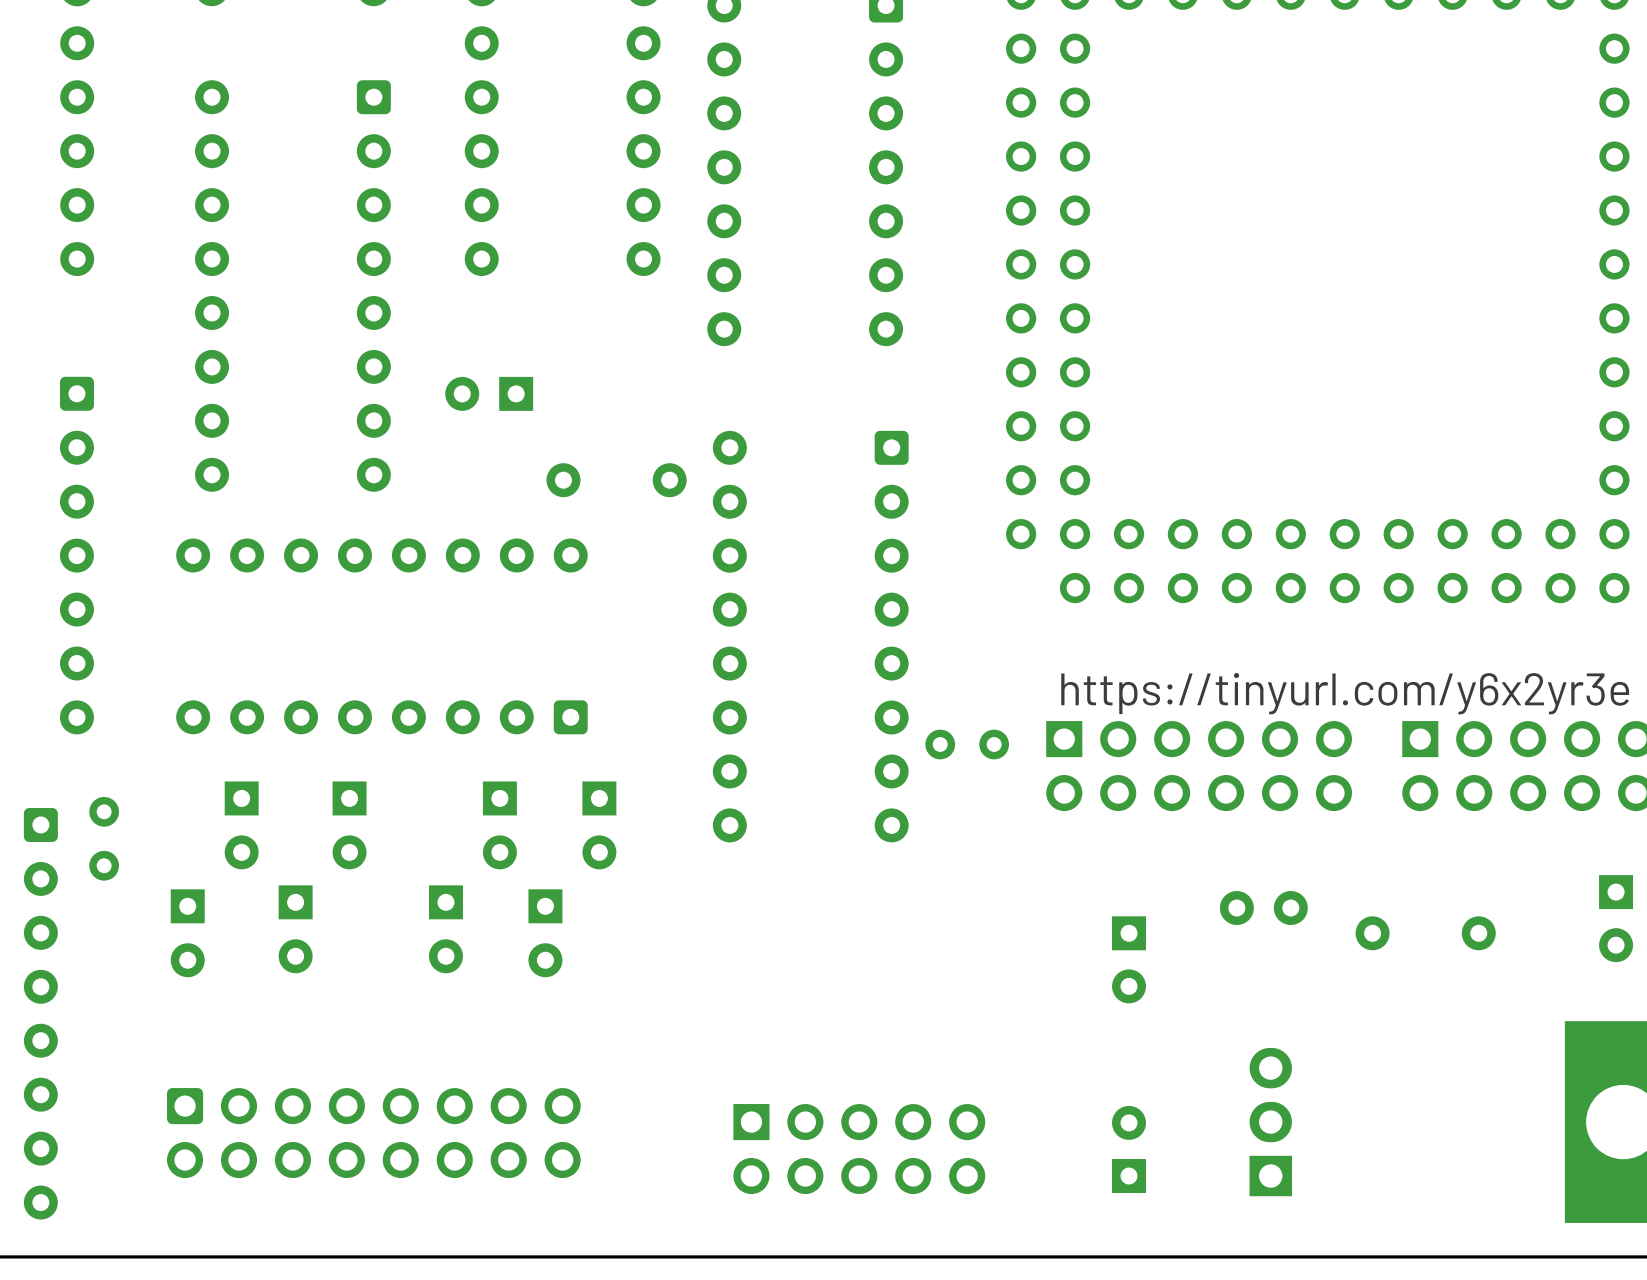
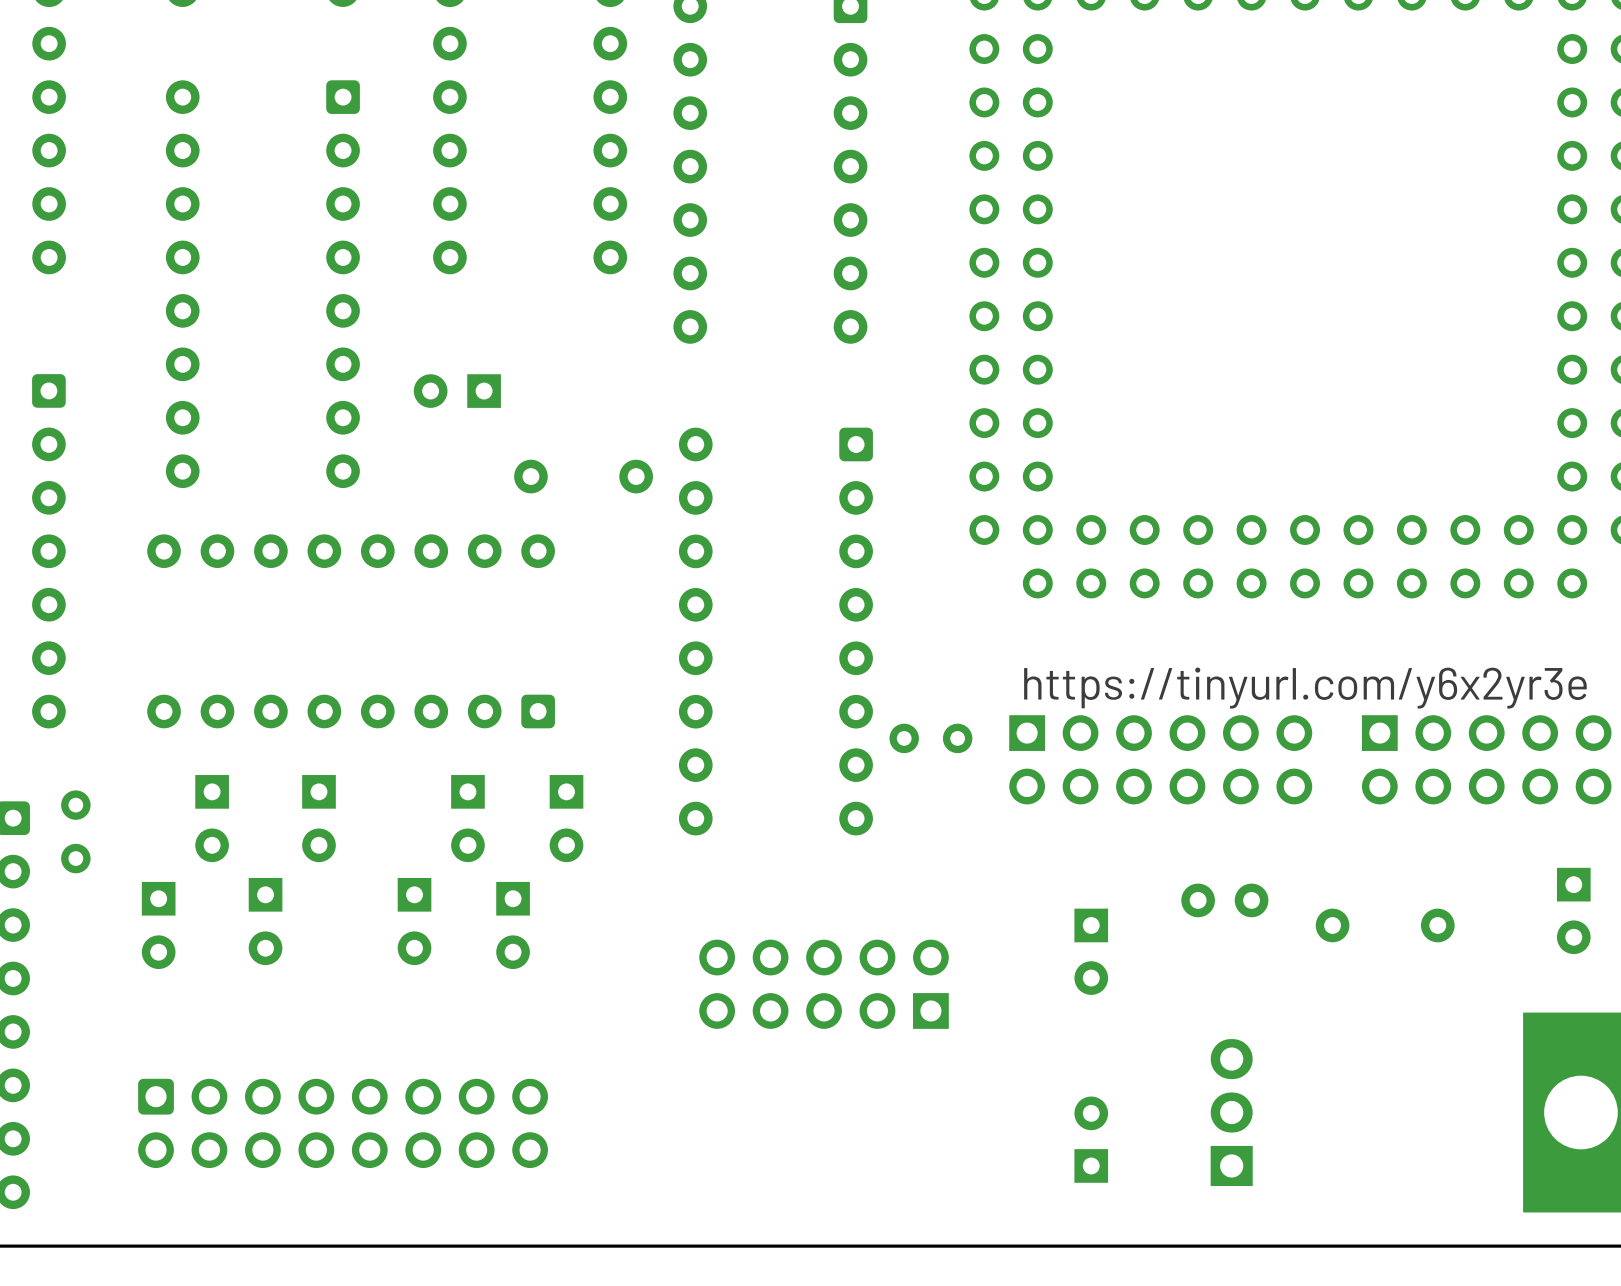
part rotation: 0° (859, 1149) -> 180° (824, 984)
part position: (859, 1149) -> (824, 984)

